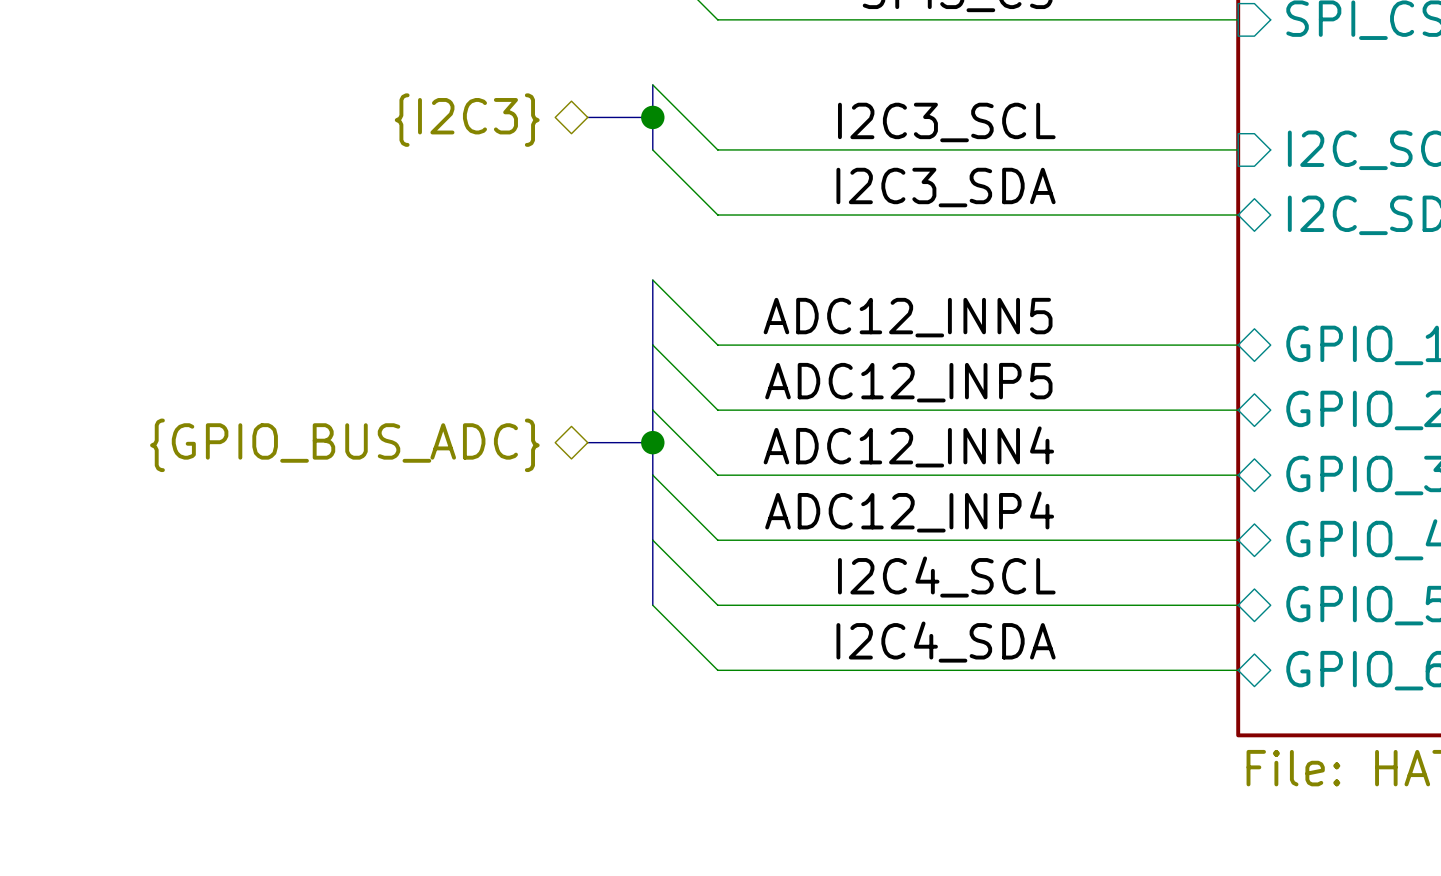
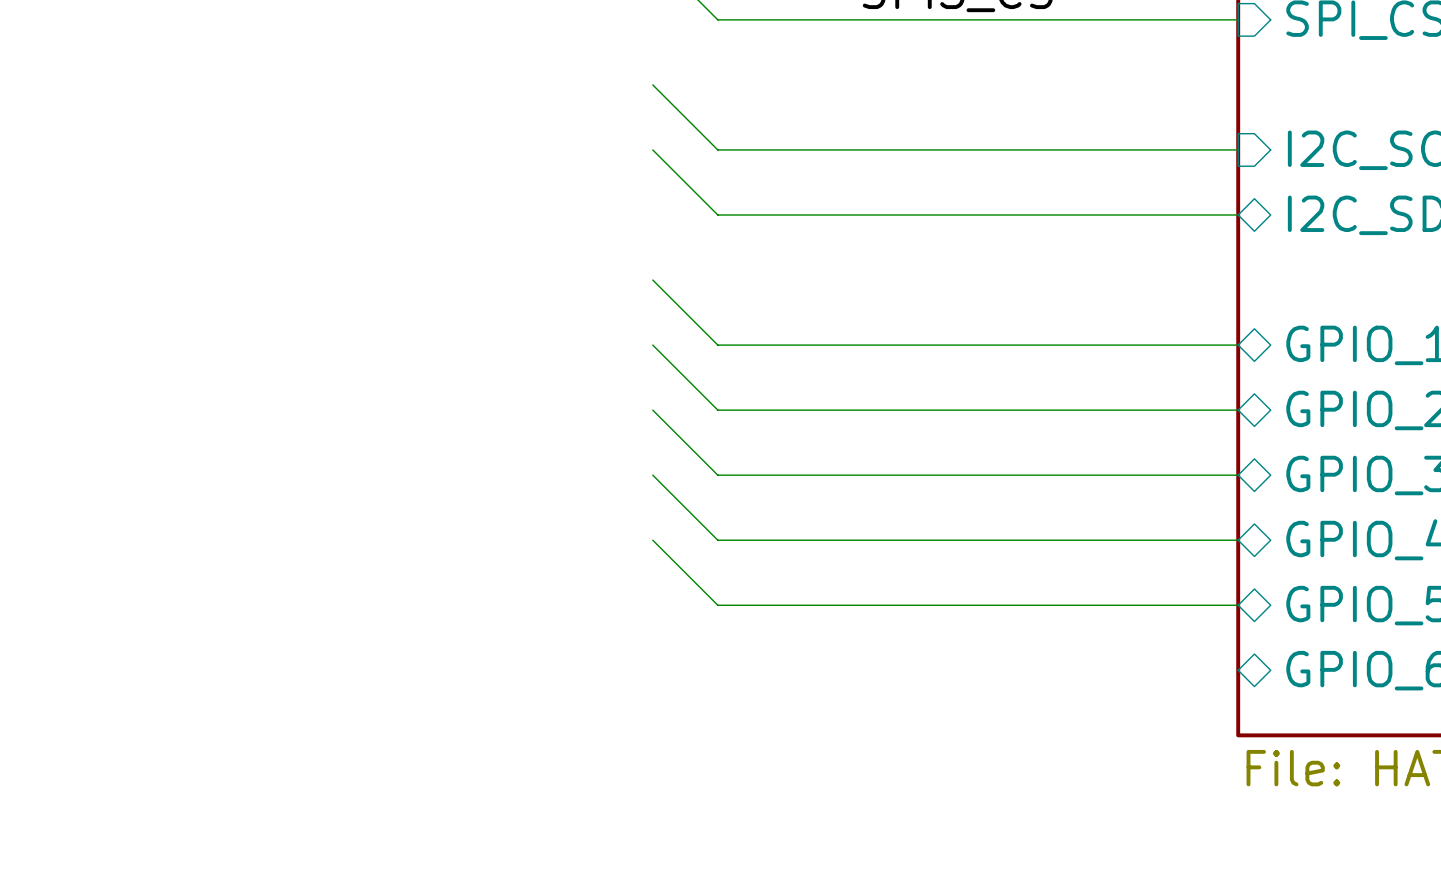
bus: (652, 84) (652, 149) -> none
bus: (587, 117) (652, 117) -> none
junction: (652, 117) -> none
hierarchical label: {I2C3} (467, 120) -> none
label: I2C3_SCL (946, 122) -> none
label: I2C3_SDA (946, 187) -> none
bus: (652, 280) (652, 605) -> none
label: ADC12_INN5 (908, 317) -> none
label: ADC12_INP5 (908, 382) -> none
bus: (587, 442) (652, 442) -> none
junction: (652, 442) -> none
hierarchical label: {GPIO_BUS_ADC} (344, 445) -> none
label: ADC12_INN4 (908, 446) -> none
label: ADC12_INP4 (909, 511) -> none
label: I2C4_SCL (946, 577) -> none
wire: (652, 605) (717, 670) (1238, 670) -> none
label: I2C4_SDA (946, 642) -> none

